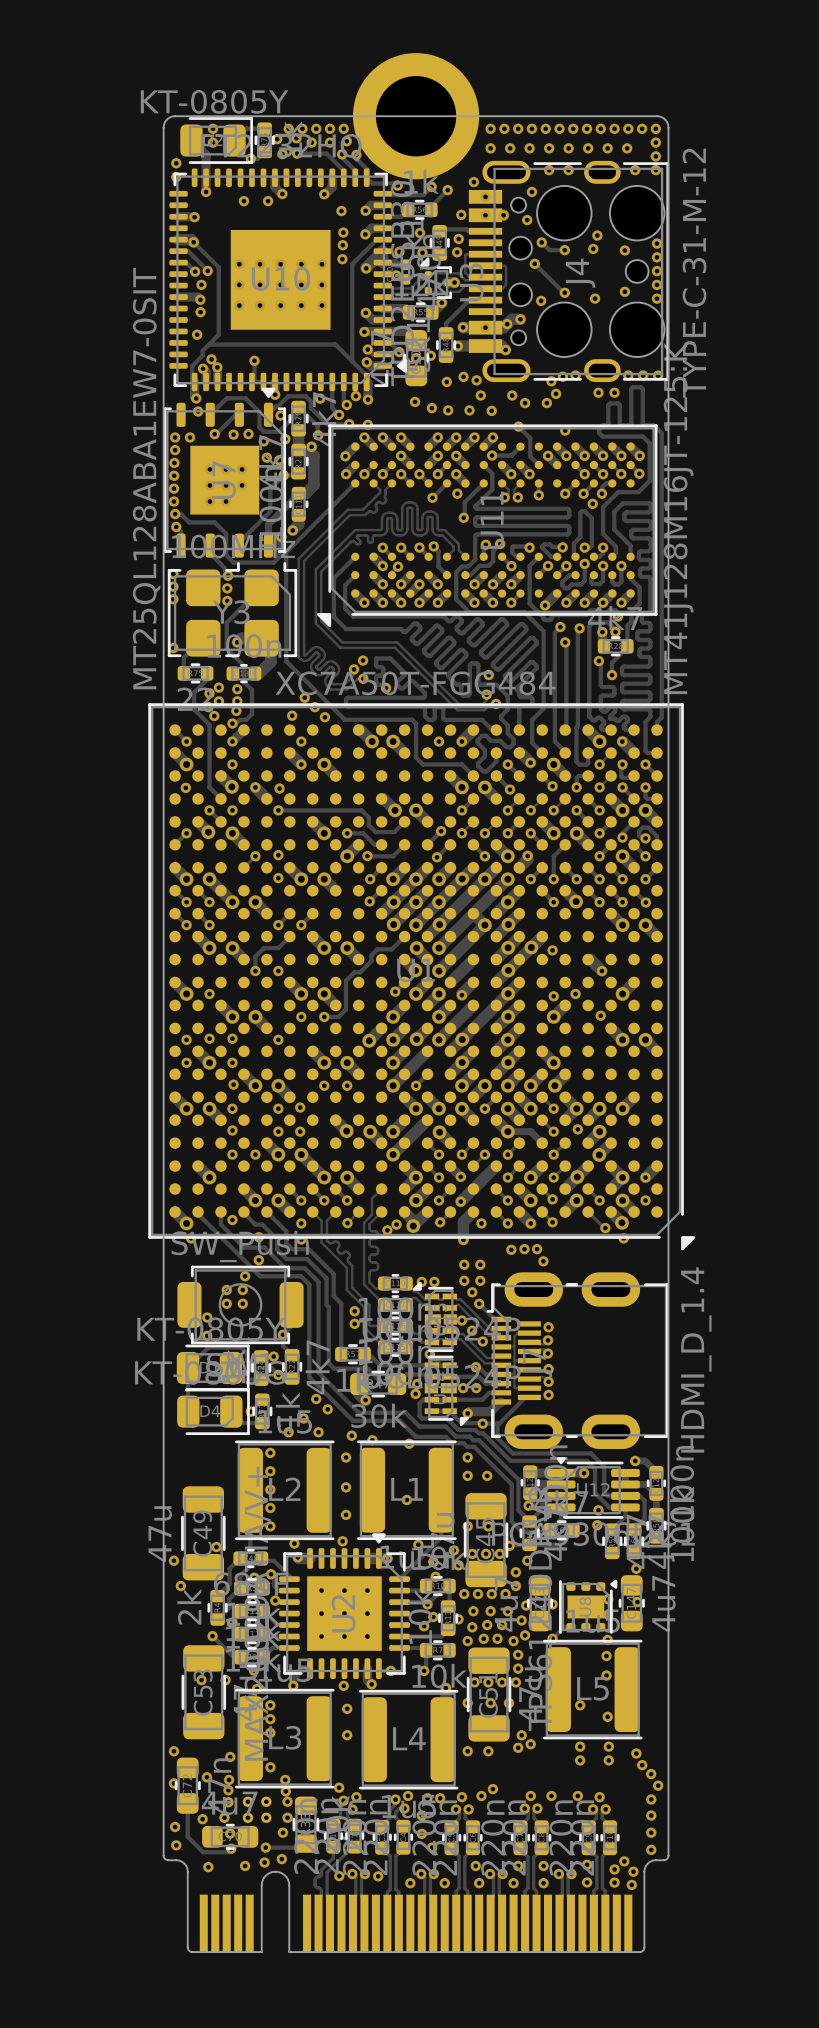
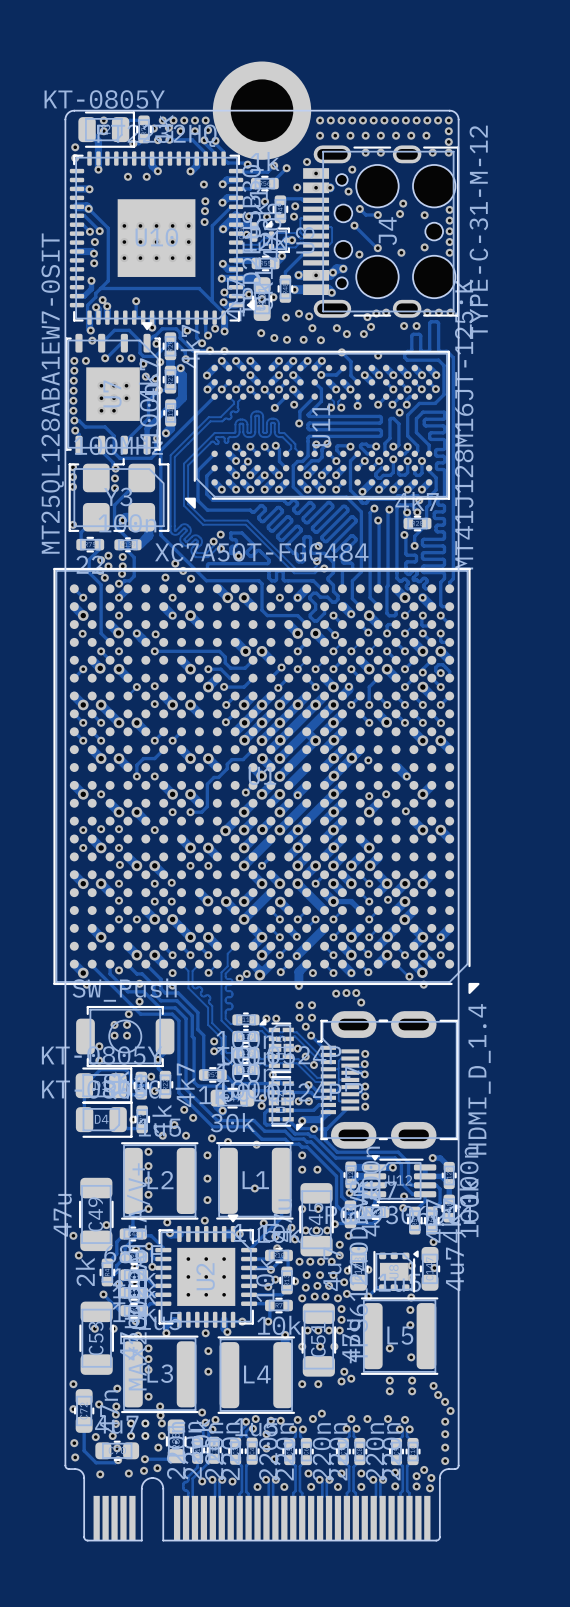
track: none -> (91, 280) (91, 288) (84, 296) (77, 296)
track: none -> (306, 892) (324, 910)

